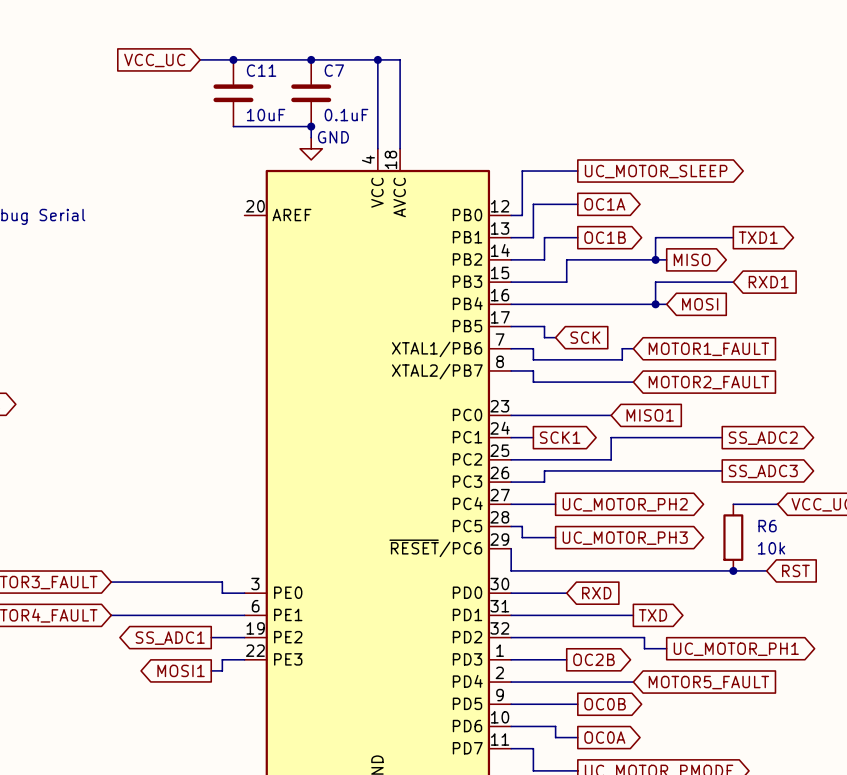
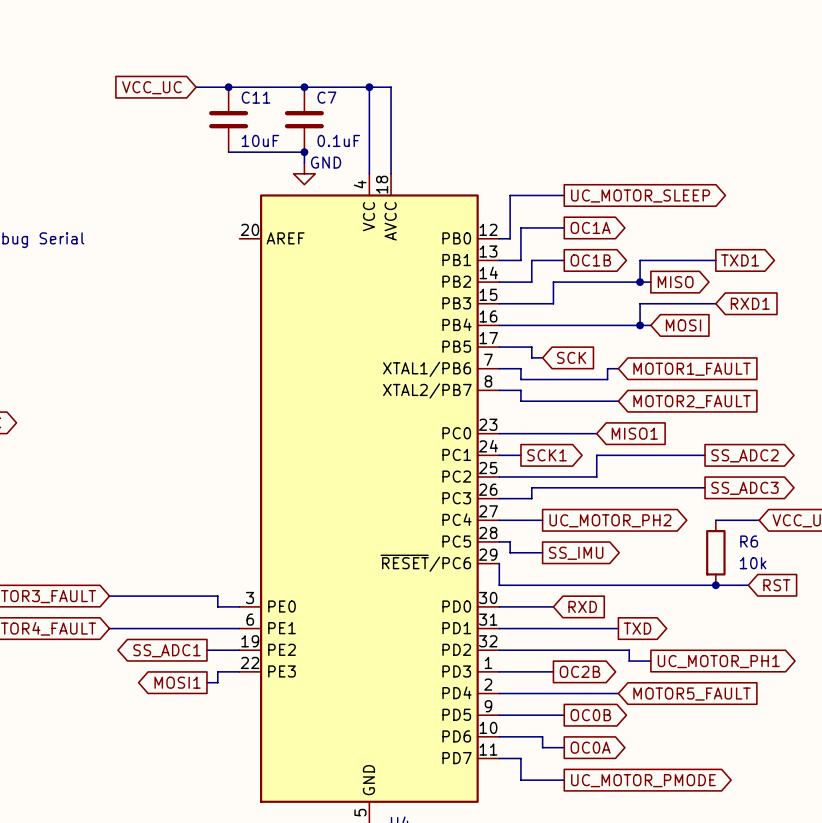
global label: UC_MOTOR_PH3 (625, 538) -> SS_IMU (576, 553)

